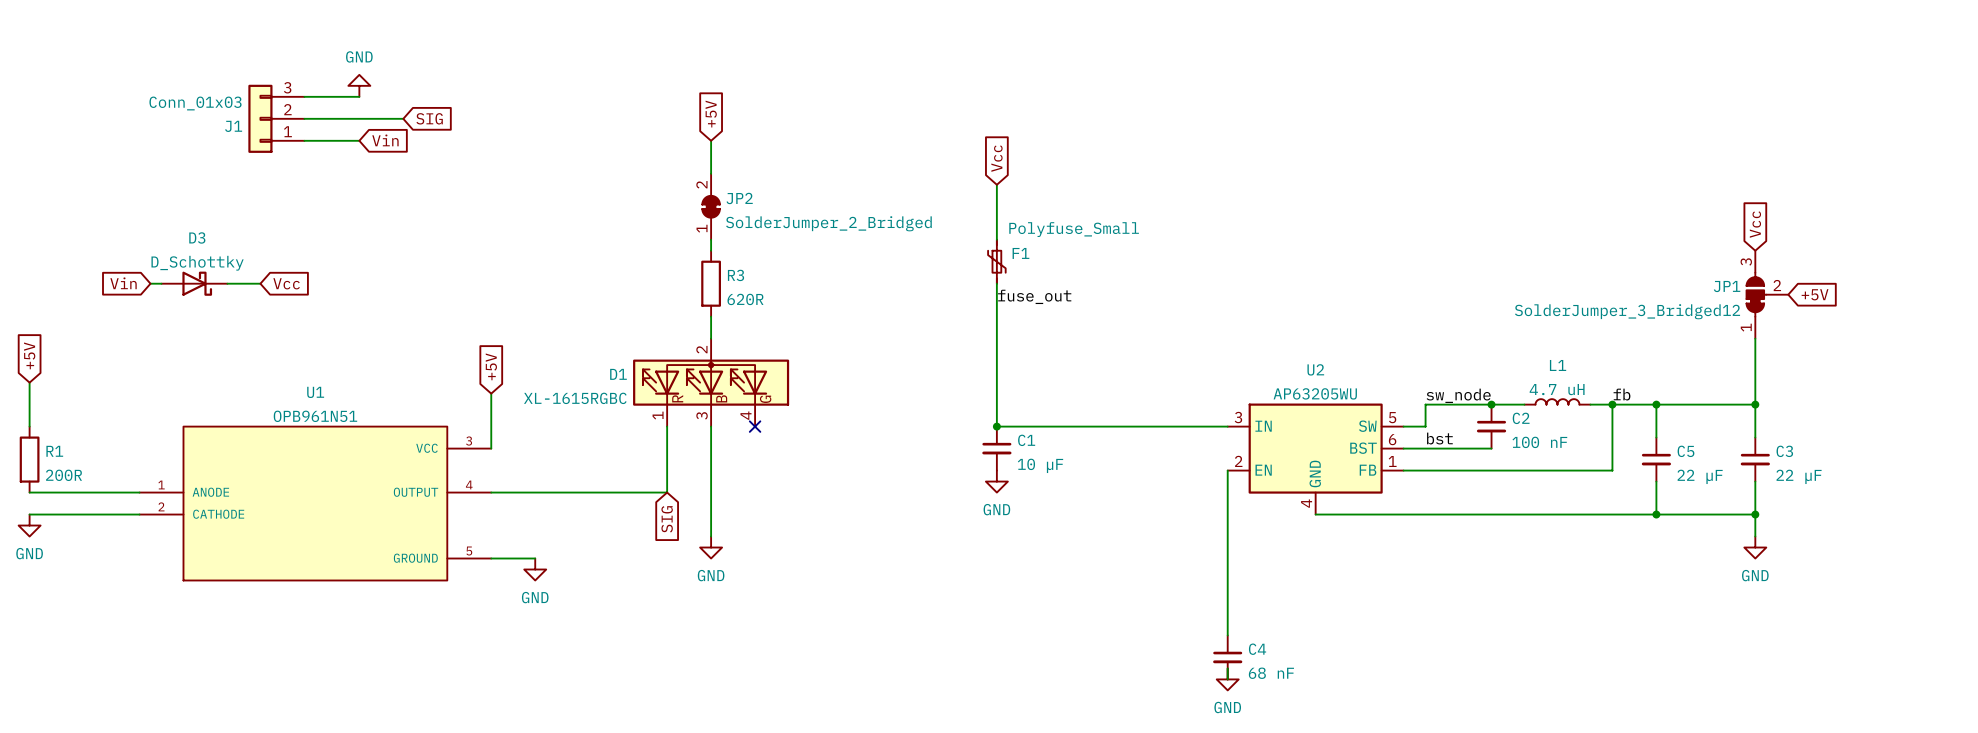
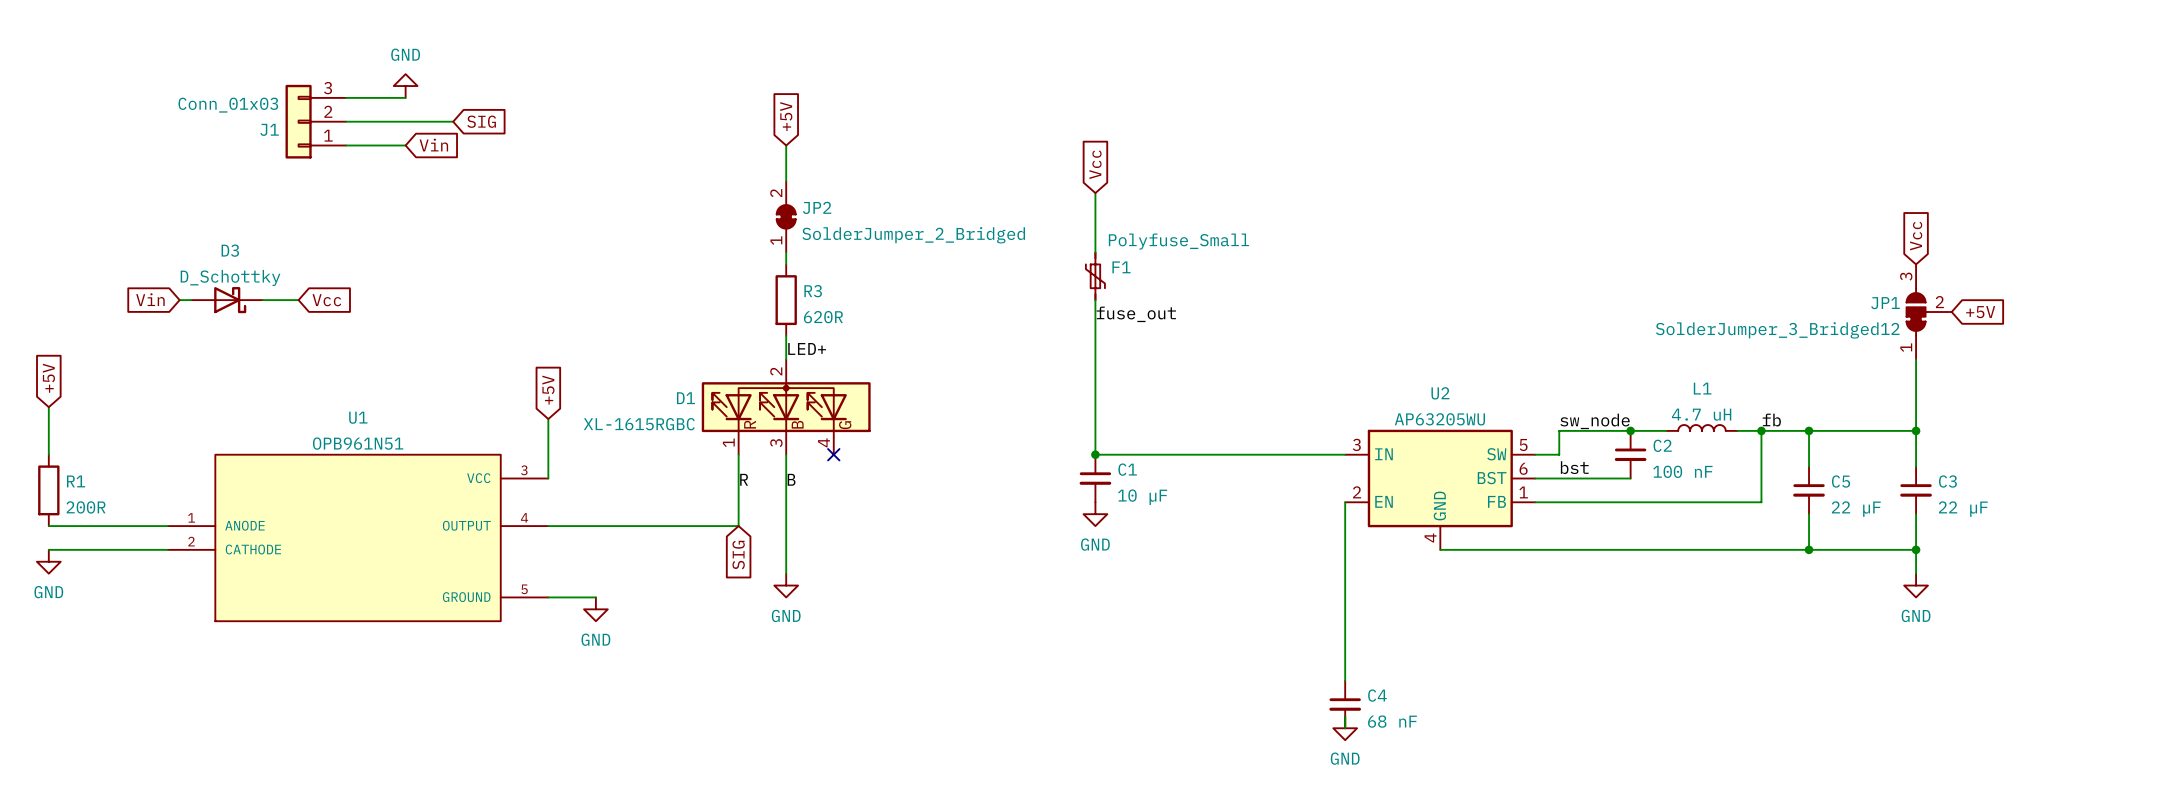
label: none -> LED+ (807, 348)
label: none -> R (744, 479)
label: none -> B (791, 479)

